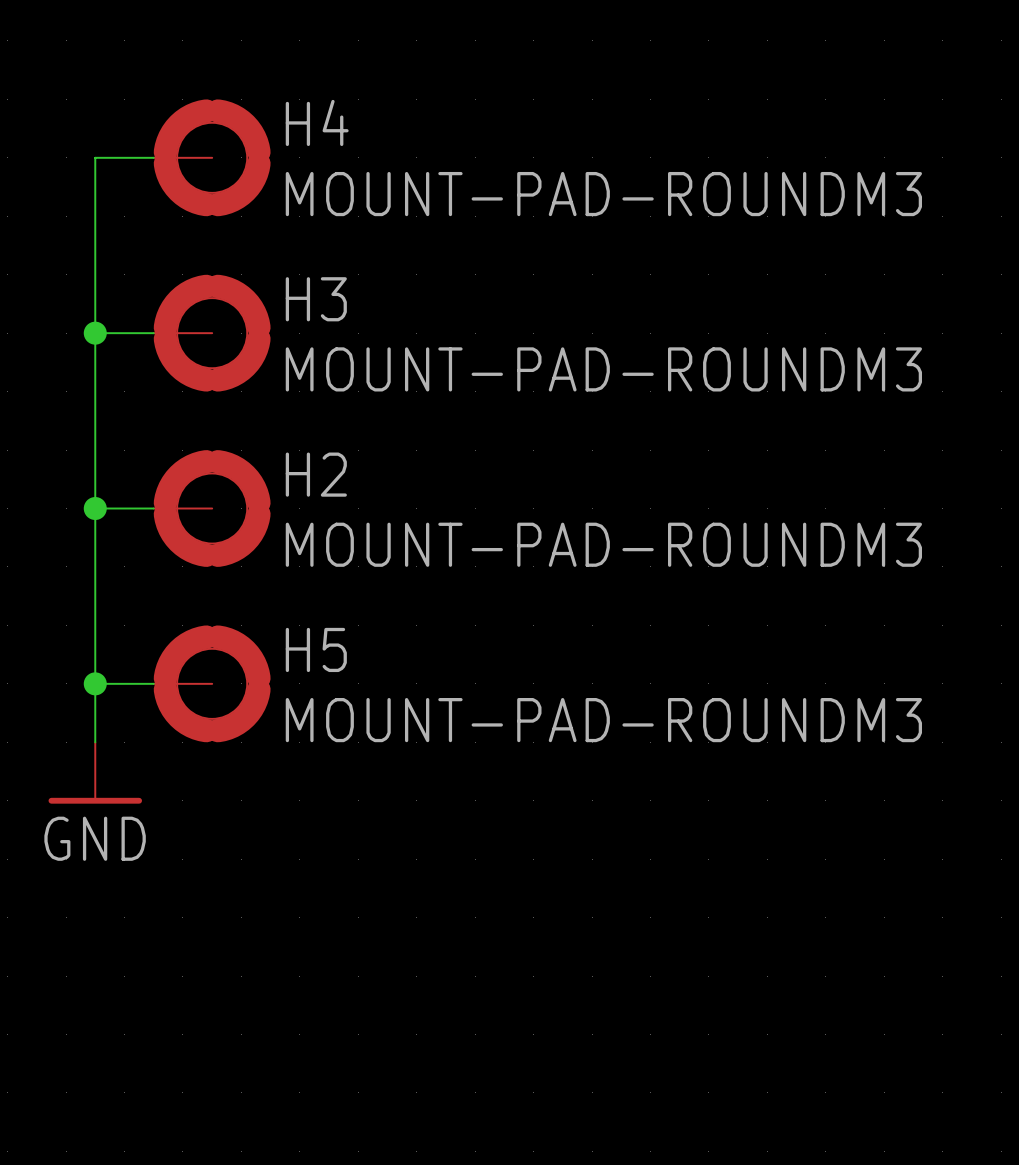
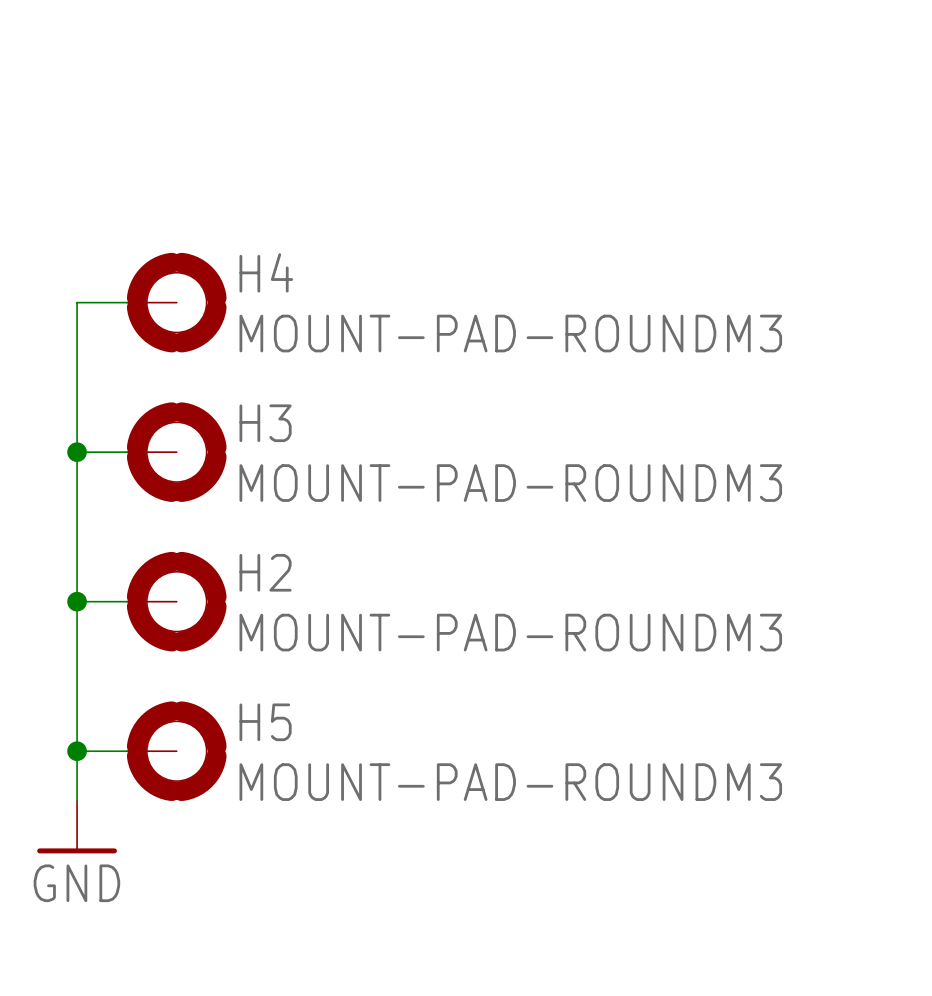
wire: (153, 157) (95, 157) (95, 333) -> none
H4: MOUNT-PAD-ROUNDM3 (212, 157) -> none
H3 name: H3 (316, 299) -> H4 (266, 272)
junction: (95, 333) -> none
H2 name: H2 (316, 474) -> H3 (265, 423)
H5 name: H5 (316, 649) -> H2 (265, 572)
wire: none -> (77, 651) (77, 801)
power symbol position: GND (95, 772) -> GND (77, 827)
wire: none -> (77, 751) (126, 751)
junction: none -> (77, 751)
H5: none -> MOUNT-PAD-ROUNDM3 (176, 751)

